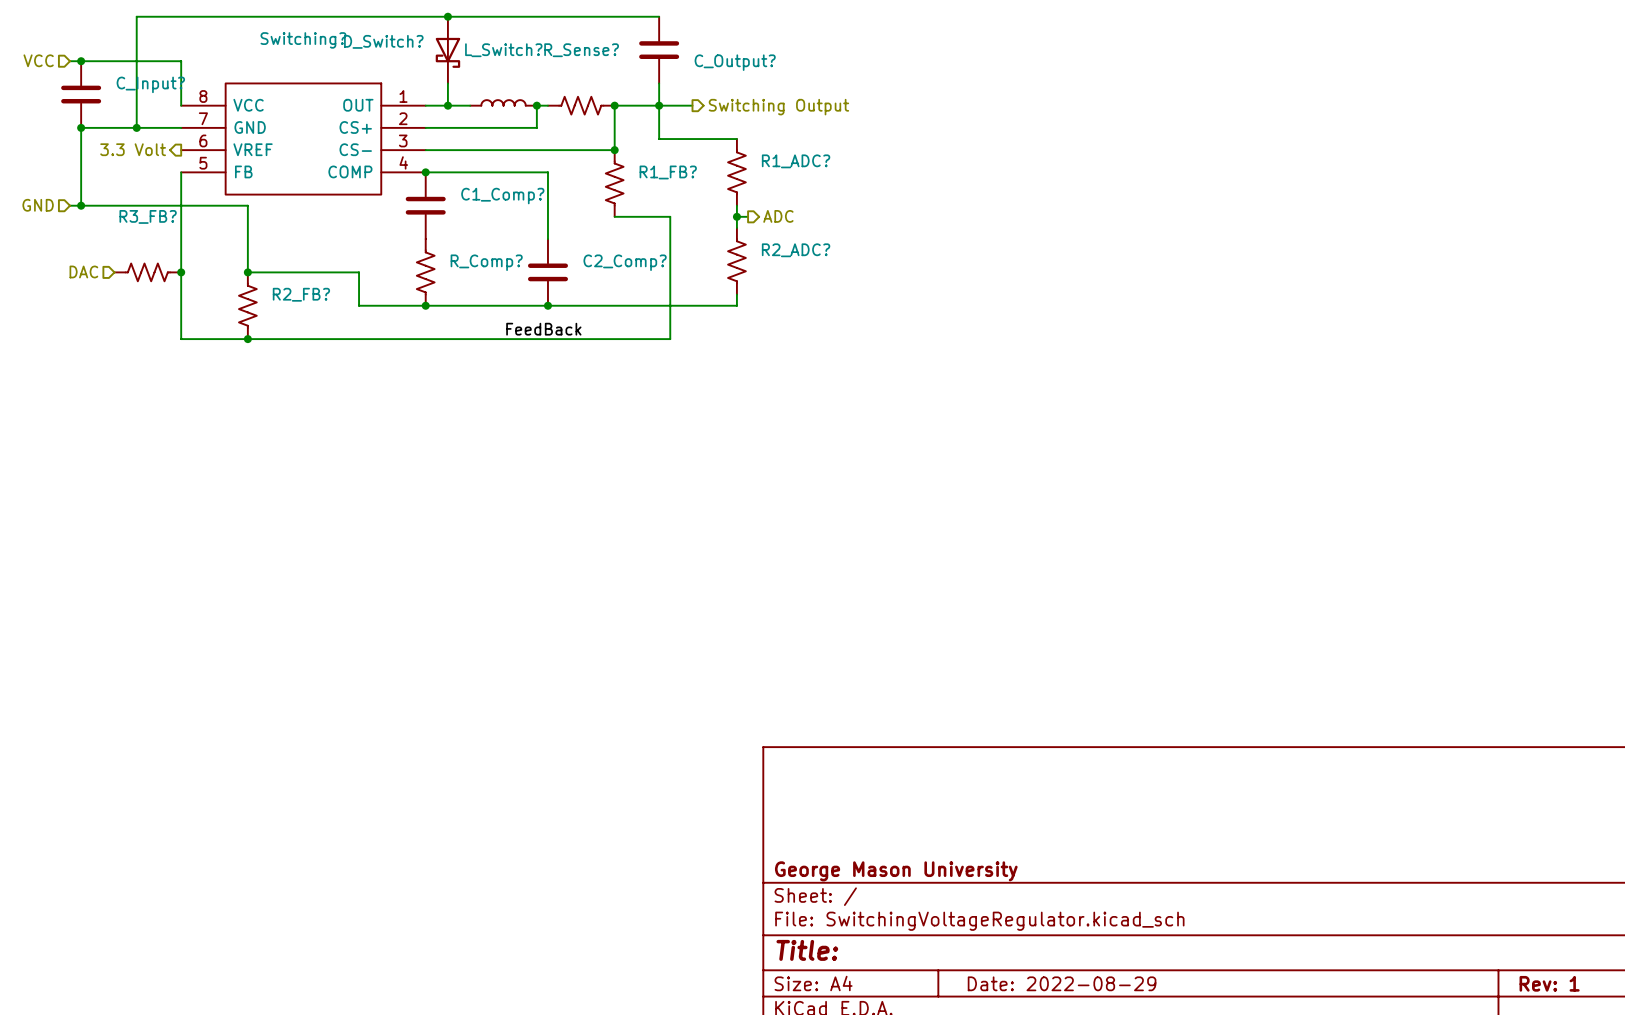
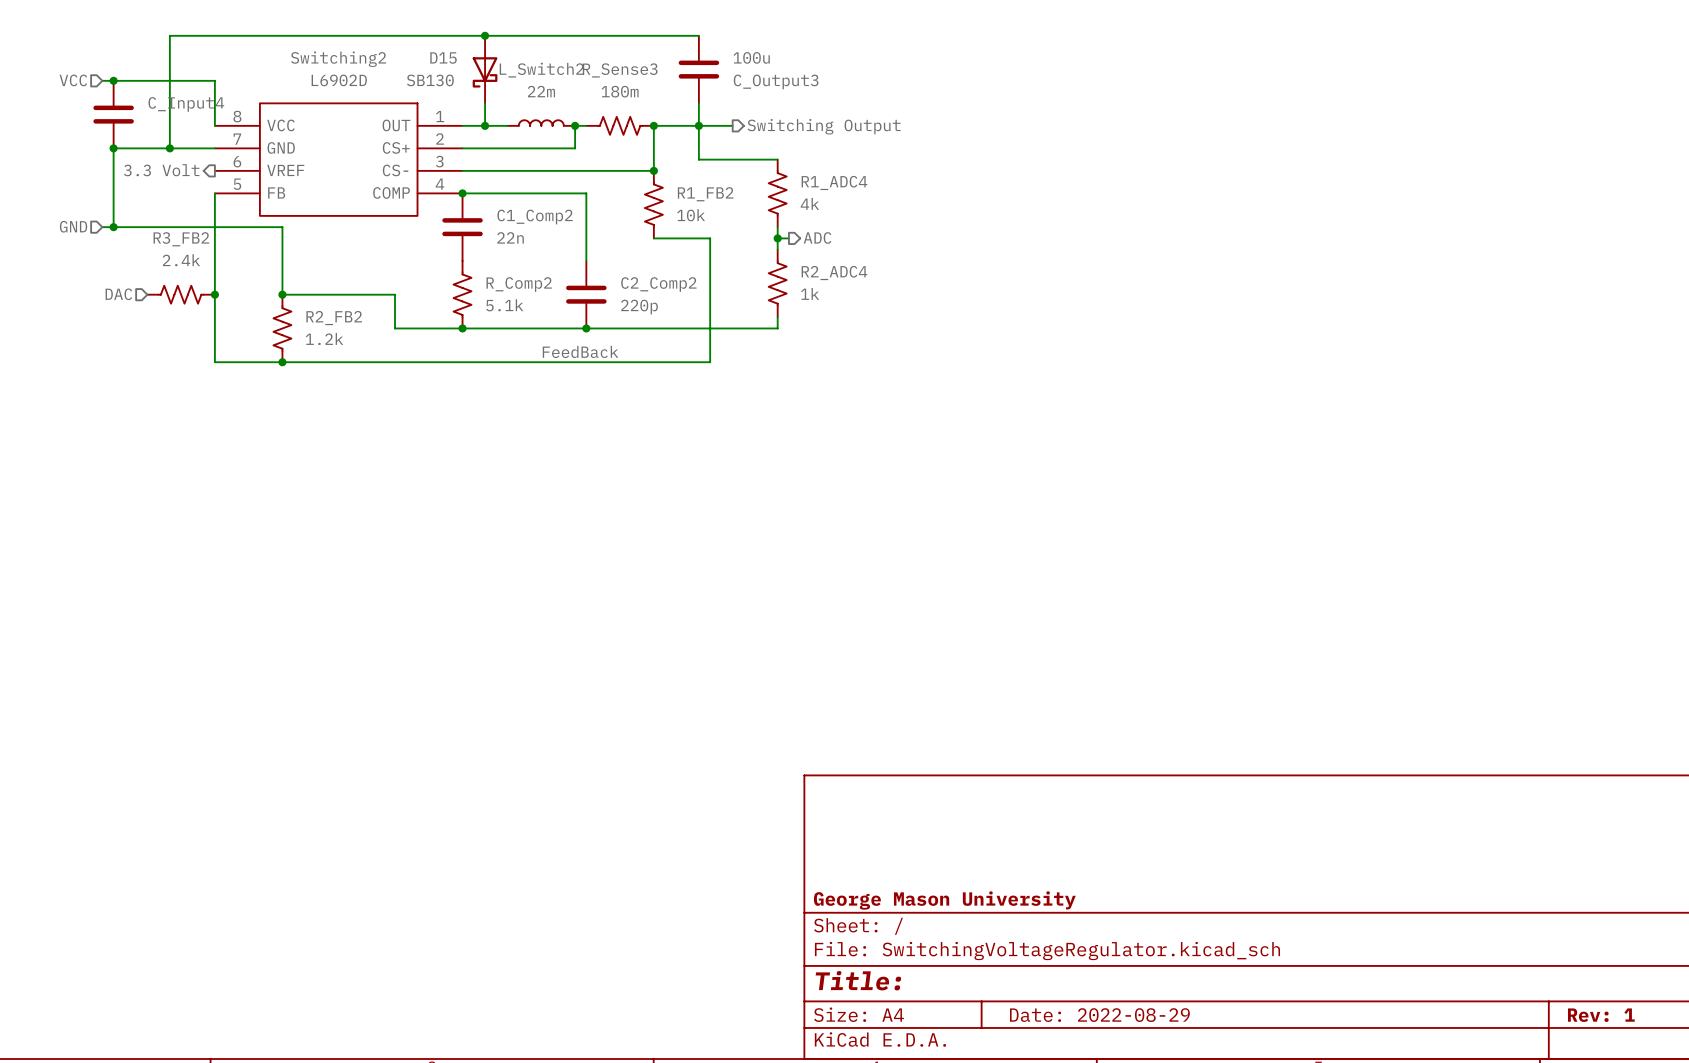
C_Output? value: none -> 100u (751, 57)
Switching? name: Switching? (303, 40) -> Switching2 (338, 59)
D_Switch?: (447, 50) -> none
D15: none -> SB130 (485, 69)
L_Switch? name: L_Switch? (503, 50) -> L_Switch2 (541, 70)
R_Sense? name: R_Sense? (581, 50) -> R_Sense3 (620, 70)
Switching? value: none -> L6902D (339, 80)
C_Output? name: C_Output? (735, 62) -> C_Output3 (776, 81)
L_Switch? value: none -> 22m (541, 91)
R_Sense? value: none -> 180m (620, 91)
C_Input? name: C_Input? (150, 84) -> C_Input4 (186, 104)
R1_ADC? name: R1_ADC? (796, 161) -> R1_ADC4 (834, 182)
R1_FB? name: R1_FB? (668, 172) -> R1_FB2 (705, 194)
R1_ADC? value: none -> 4k (809, 203)
R1_FB? value: none -> 10k (691, 215)
C1_Comp? name: C1_Comp? (502, 196) -> C1_Comp2 (535, 217)
R3_FB? name: R3_FB? (148, 216) -> R3_FB2 (181, 239)
C1_Comp? value: none -> 22n (510, 237)
R3_FB? value: none -> 2.4k (181, 260)
R2_ADC? name: R2_ADC? (796, 250) -> R2_ADC4 (834, 273)
R_Comp? name: R_Comp? (486, 262) -> R_Comp2 (519, 284)
C2_Comp? name: C2_Comp? (625, 262) -> C2_Comp2 (658, 284)
R2_ADC? value: none -> 1k (810, 293)
R_Comp? value: none -> 5.1k (504, 305)
C2_Comp? value: none -> 220p (639, 307)
R2_FB? name: R2_FB? (301, 294) -> R2_FB2 (334, 318)
R2_FB? value: none -> 1.2k (324, 339)

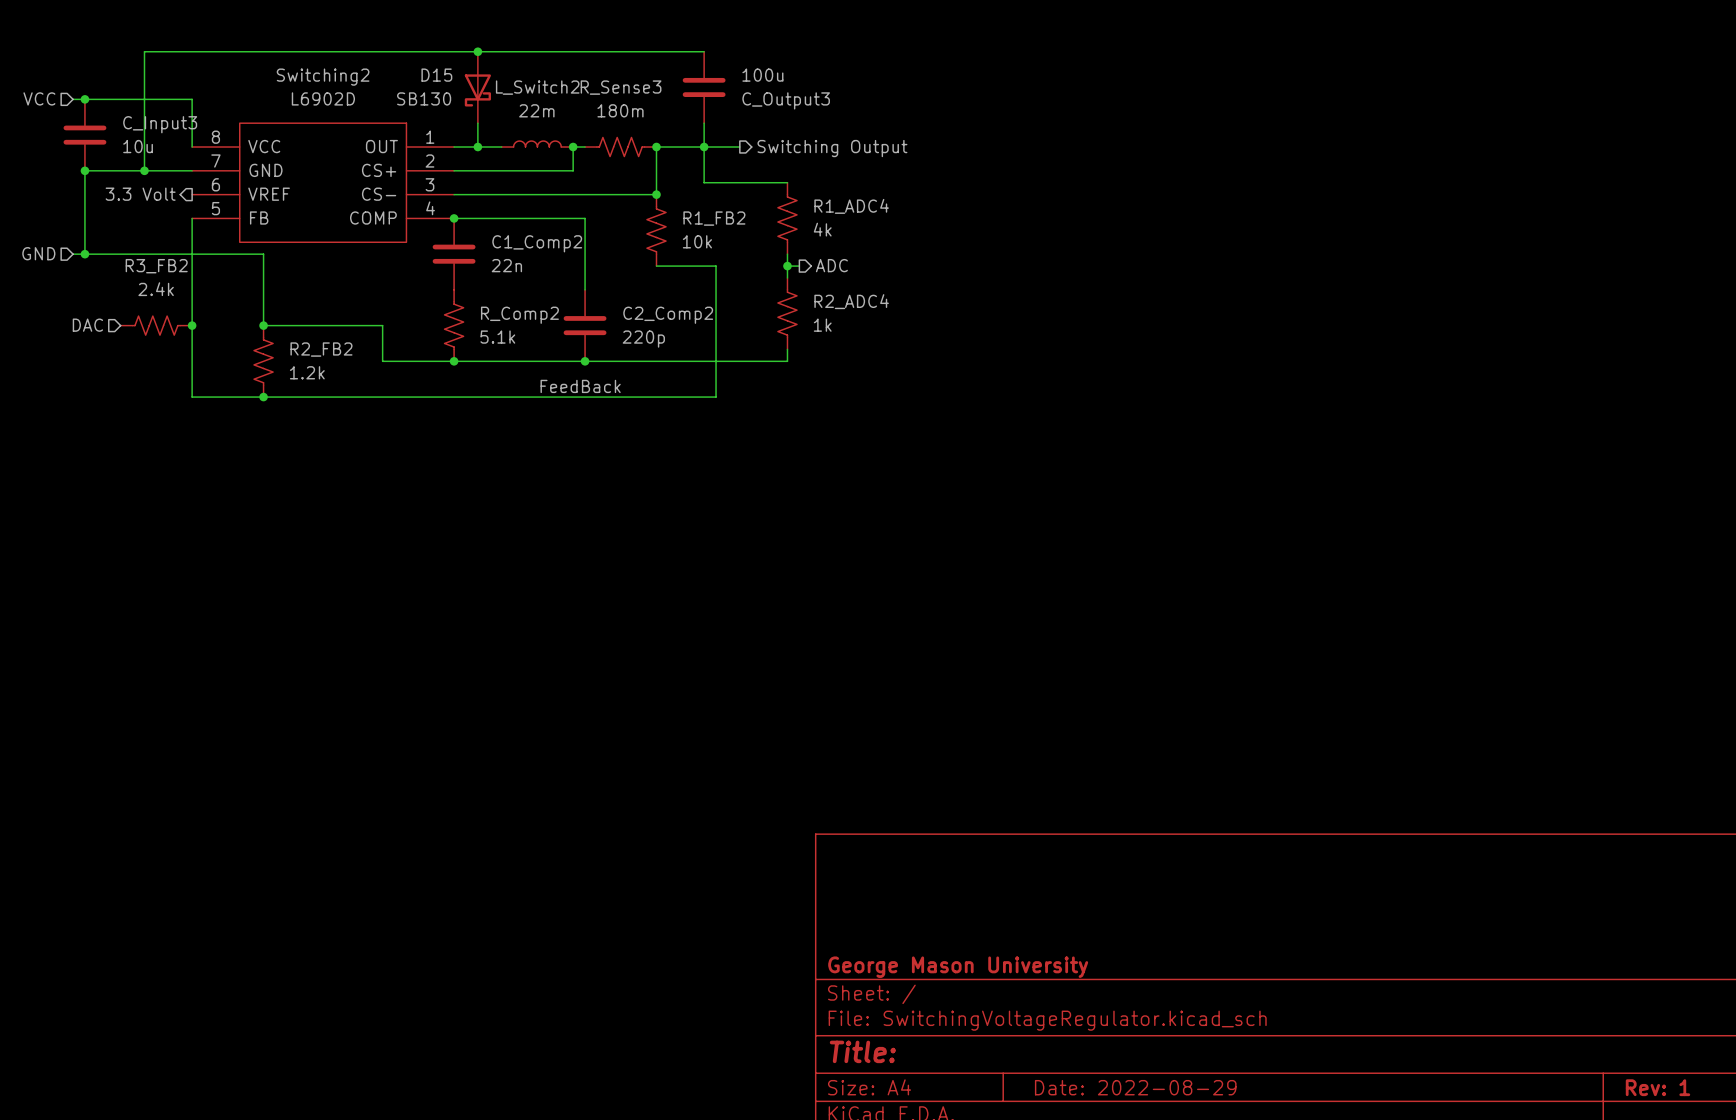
C_Input4 name: C_Input4 (186, 104) -> C_Input3 (160, 124)
C_Input4 value: none -> 10u (138, 146)

